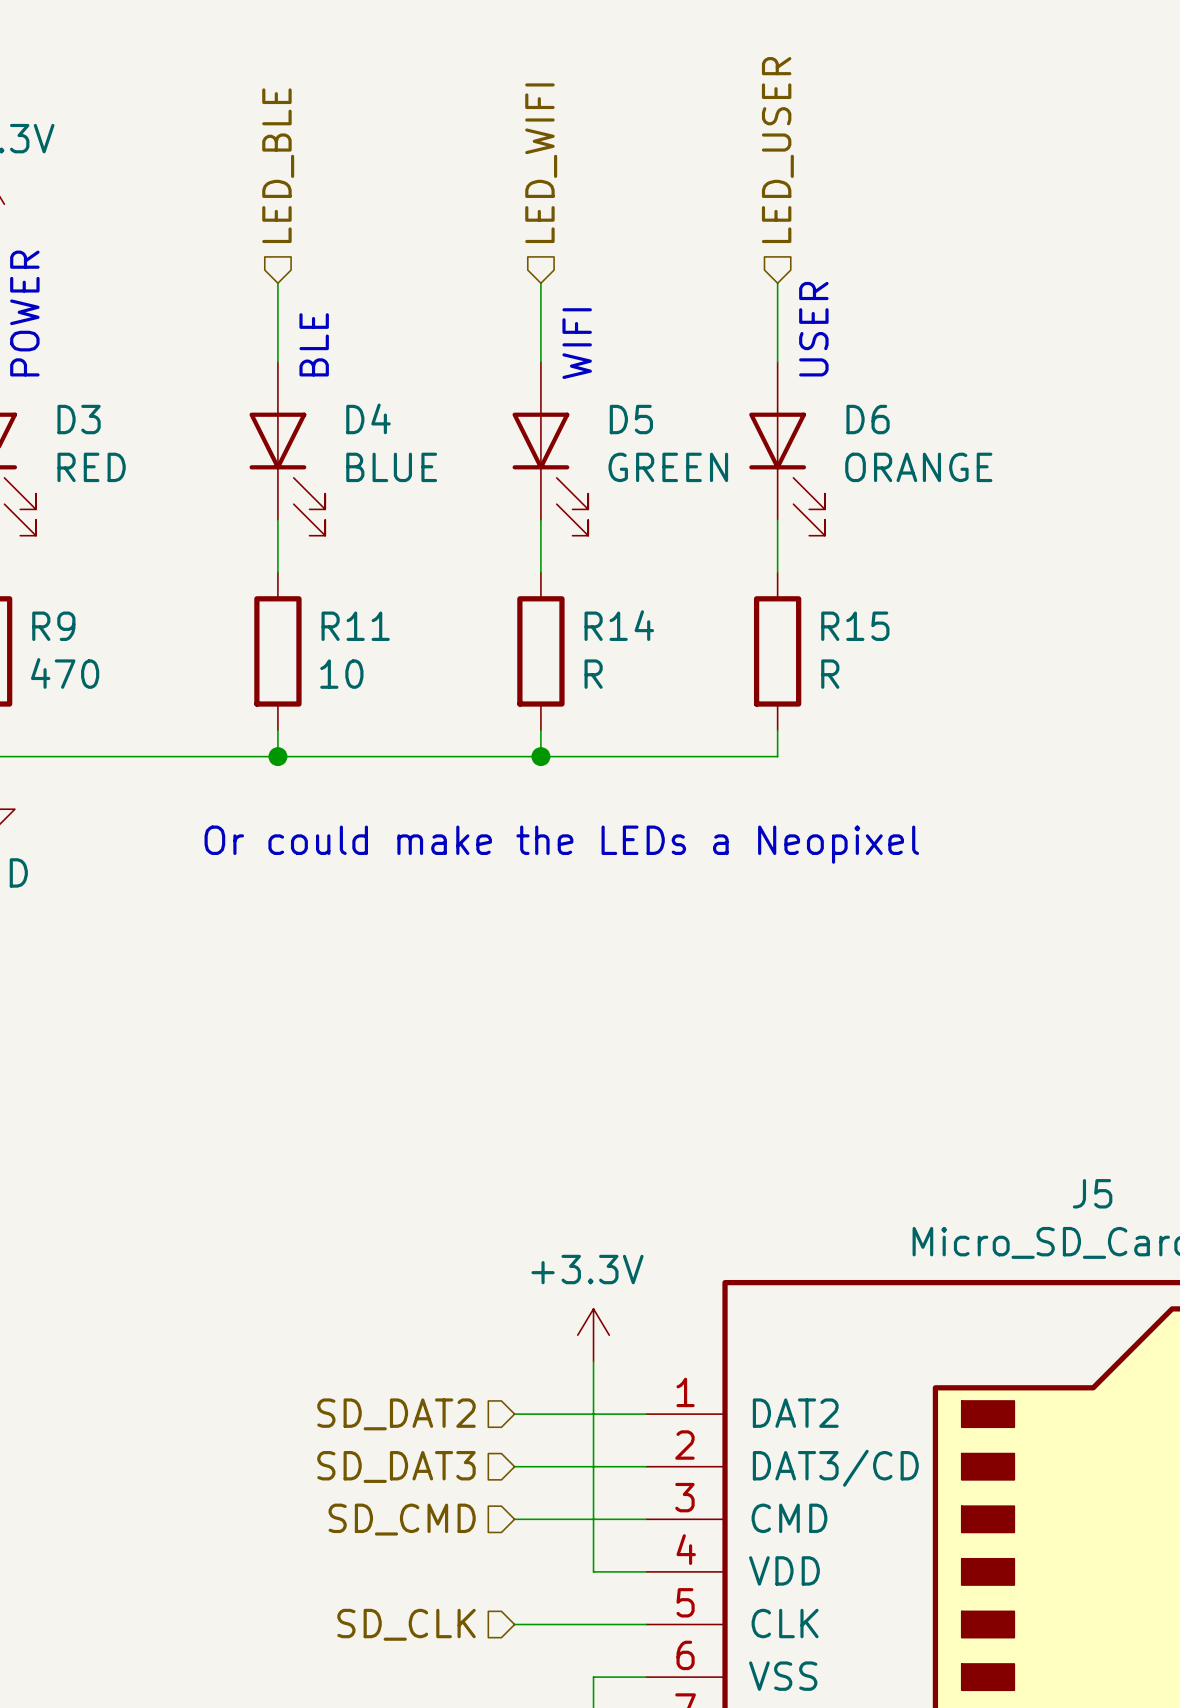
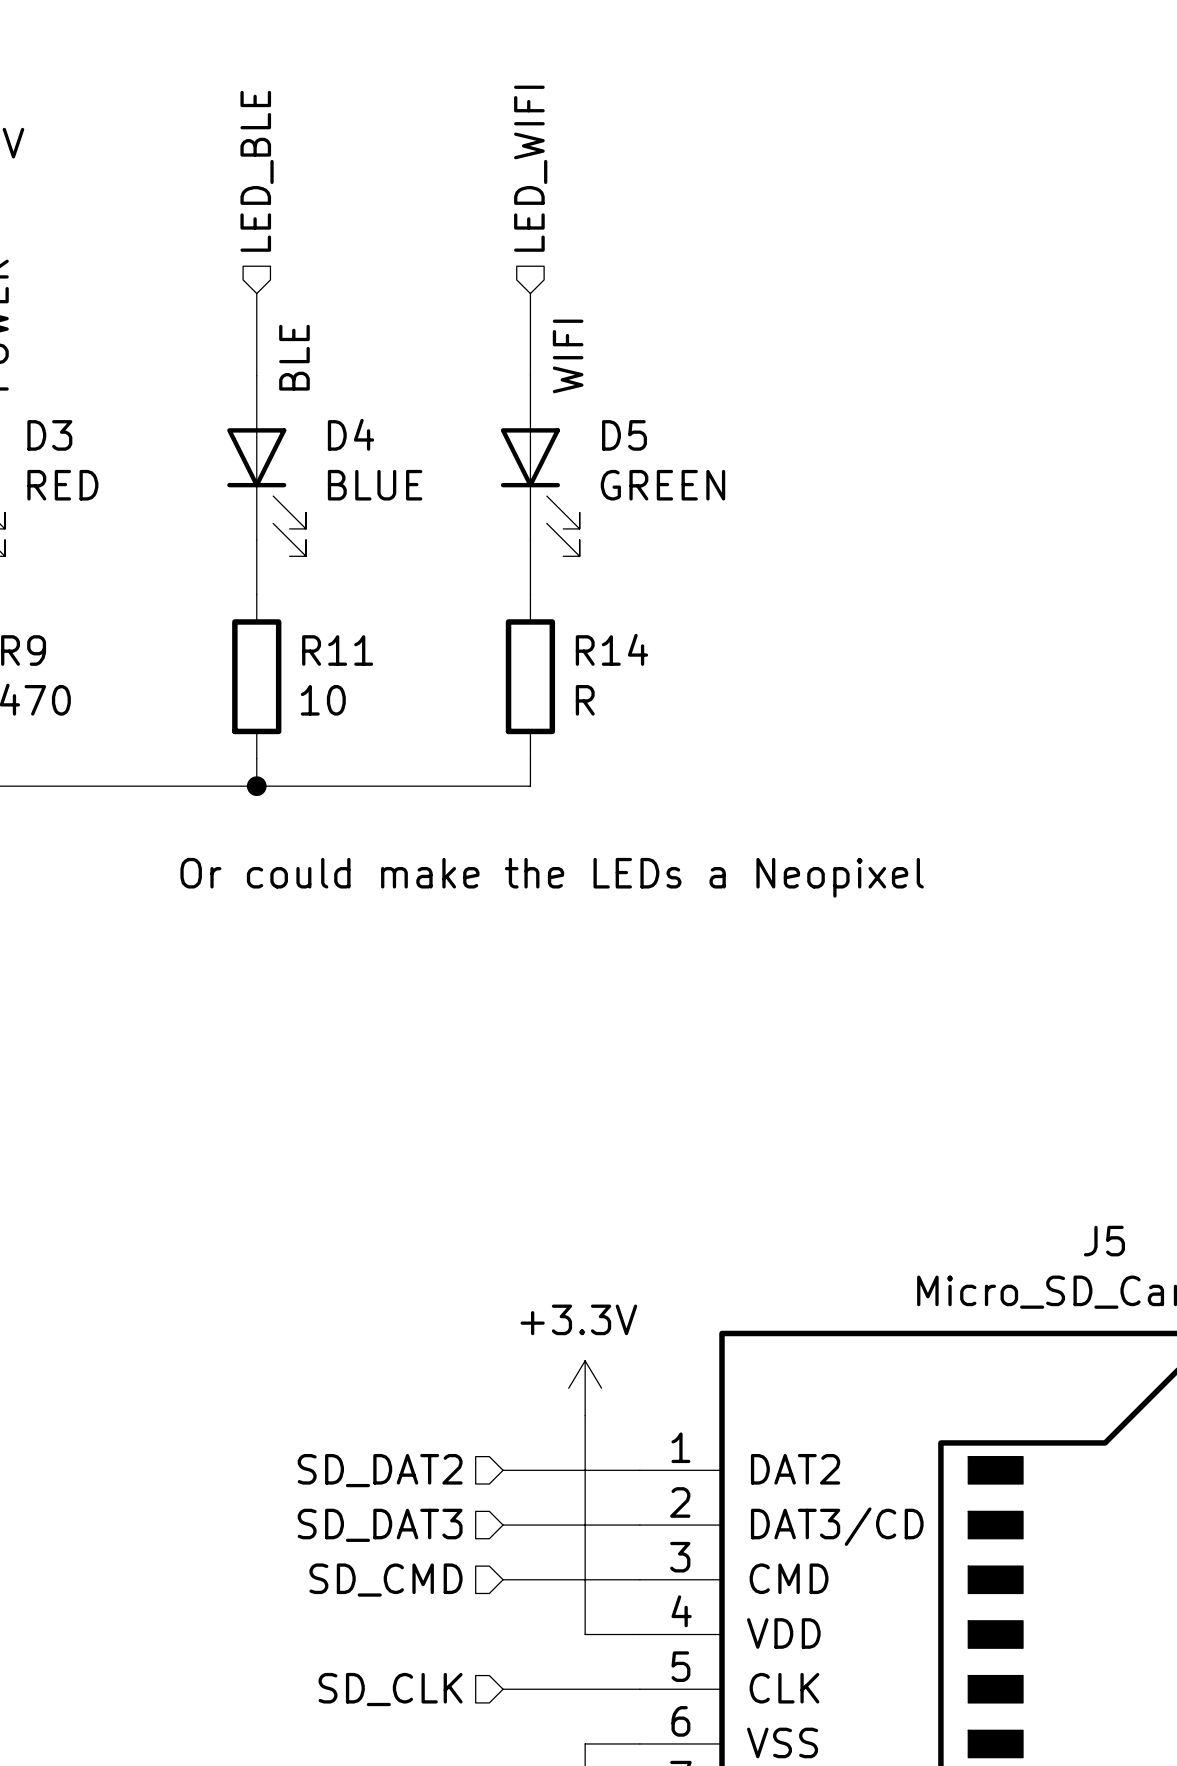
hierarchical label: LED_USER (777, 150) -> none
wire: (777, 283) (777, 362) -> none
text: USER (813, 329) -> none
D6: ORANGE (787, 448) -> none
wire: (777, 519) (777, 572) -> none
R15: R (777, 651) -> none
wire: (777, 730) (777, 756) (540, 756) -> none
junction: (540, 756) -> none

